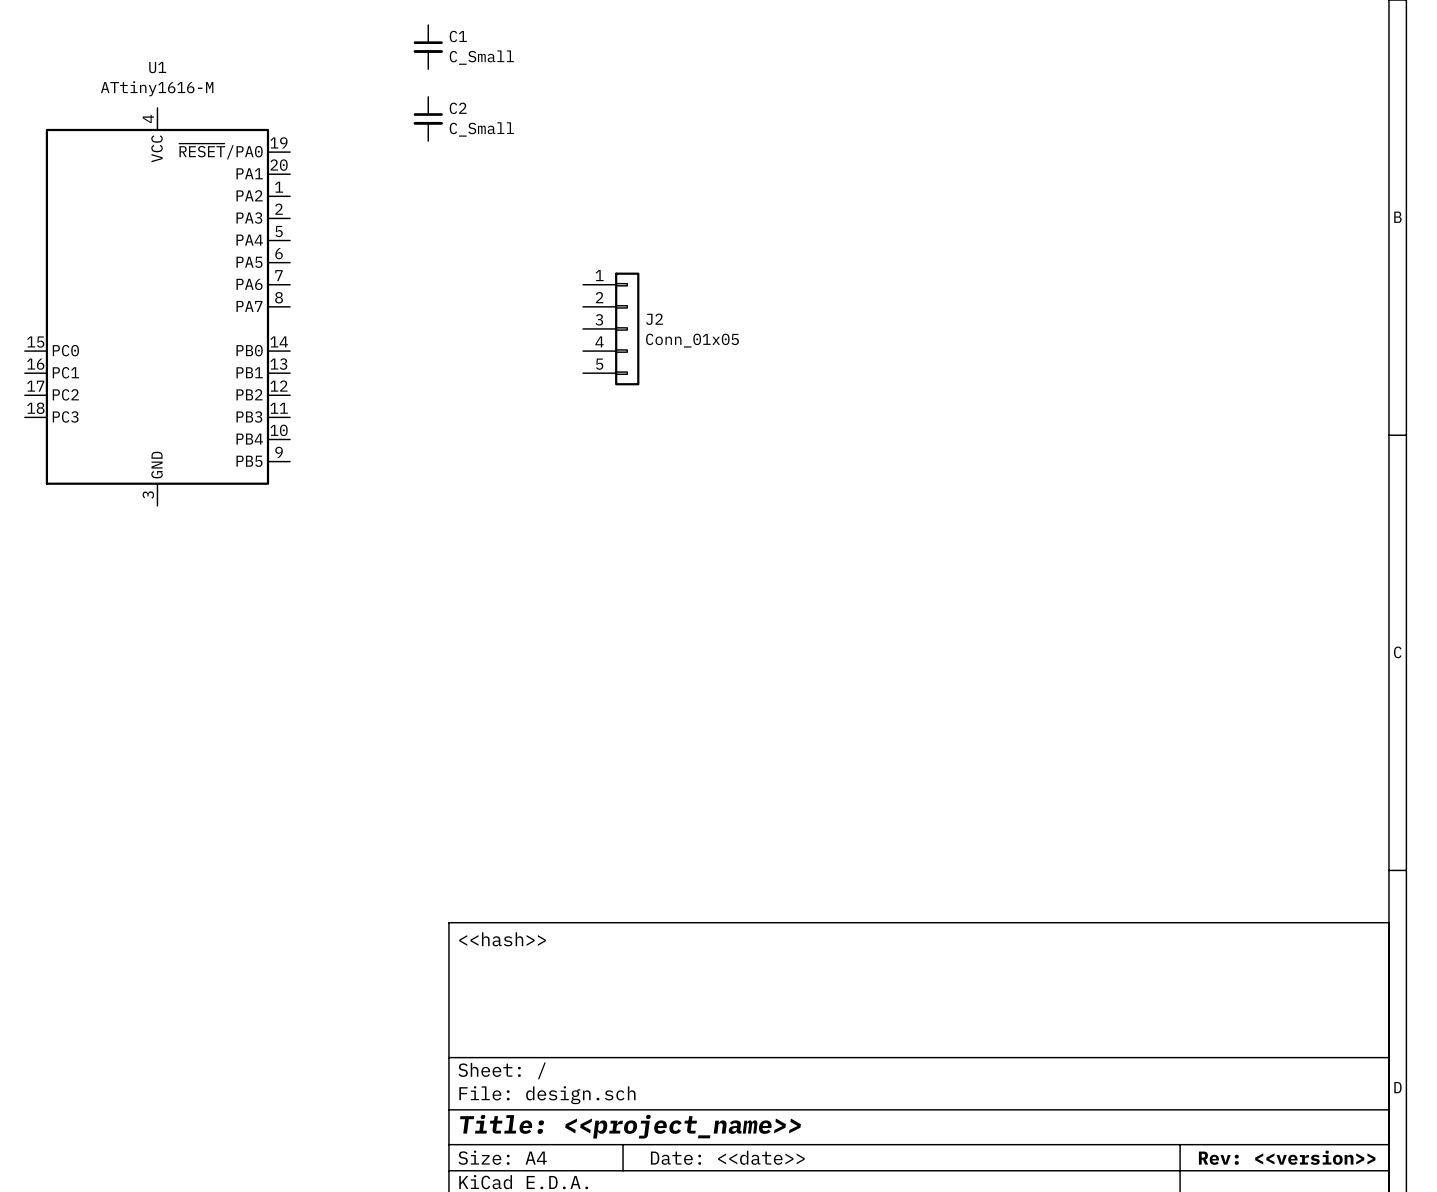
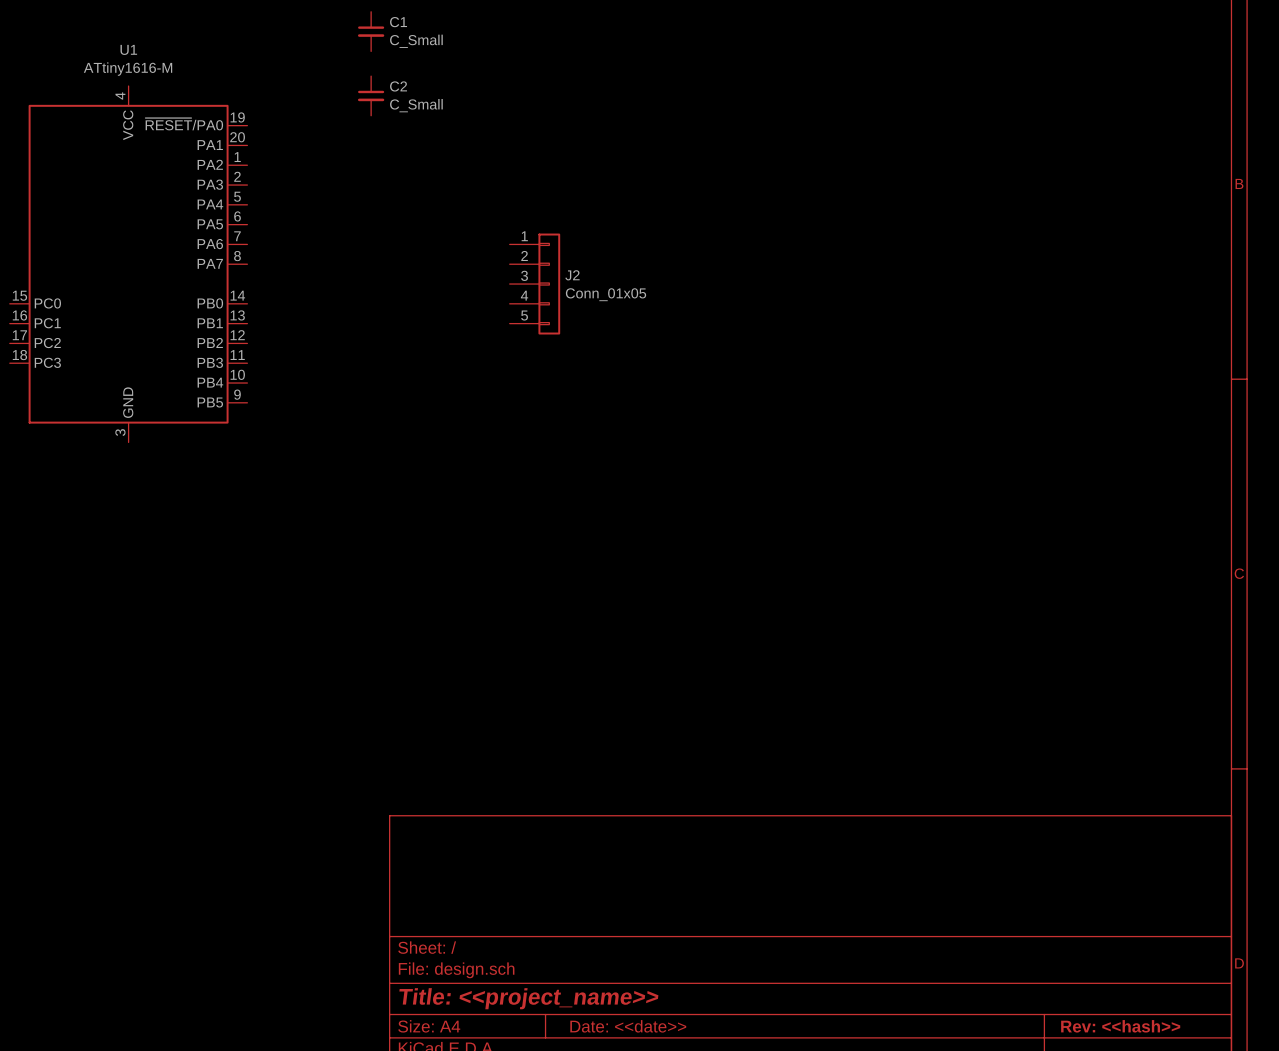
title block: <<hash>> (502, 939) -> none
title block: Rev: <<version>> (1287, 1157) -> Rev: <<hash>> (1120, 1026)

